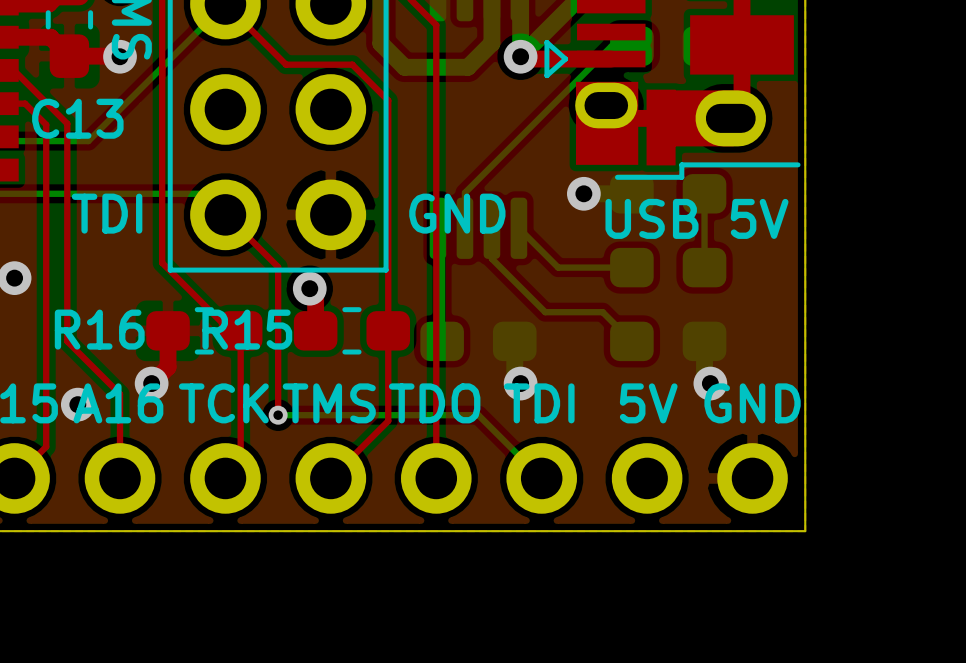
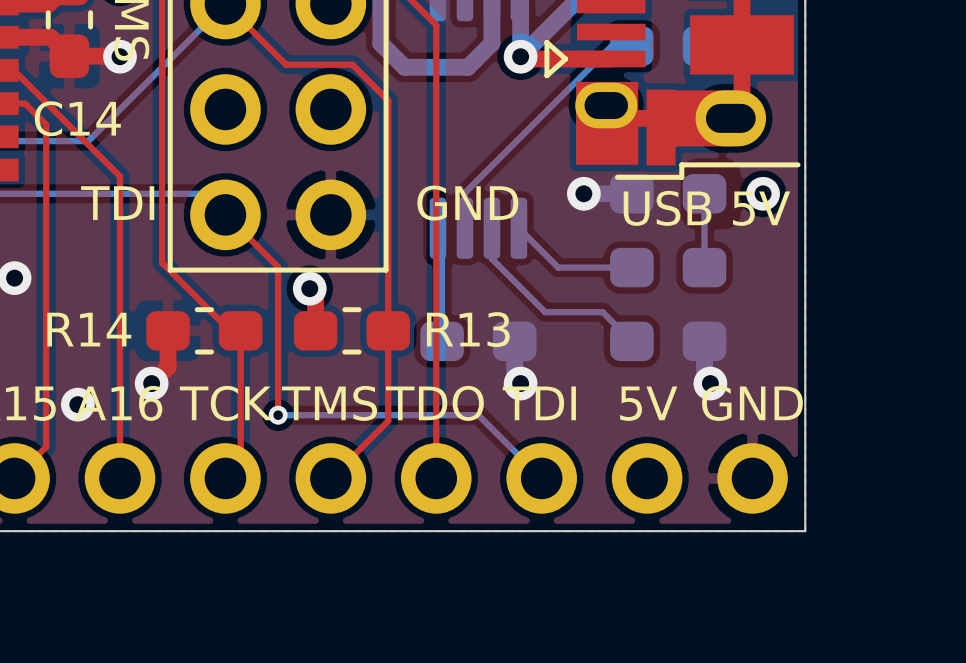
C13 name: C13 (77, 118) -> C14 (77, 118)
top track: (67, 123) (67, 341) (120, 394) -> (67, 123) (120, 176) (120, 394)
via: none -> (763, 193)
text position: TDI (107, 213) -> TDI (117, 203)
text position: GND (457, 213) -> GND (467, 203)
text position: USB 5V (696, 218) -> USB 5V (706, 208)
R16 name: R16 (99, 329) -> R14 (89, 329)
R15 name: R15 (247, 329) -> R13 (468, 329)

